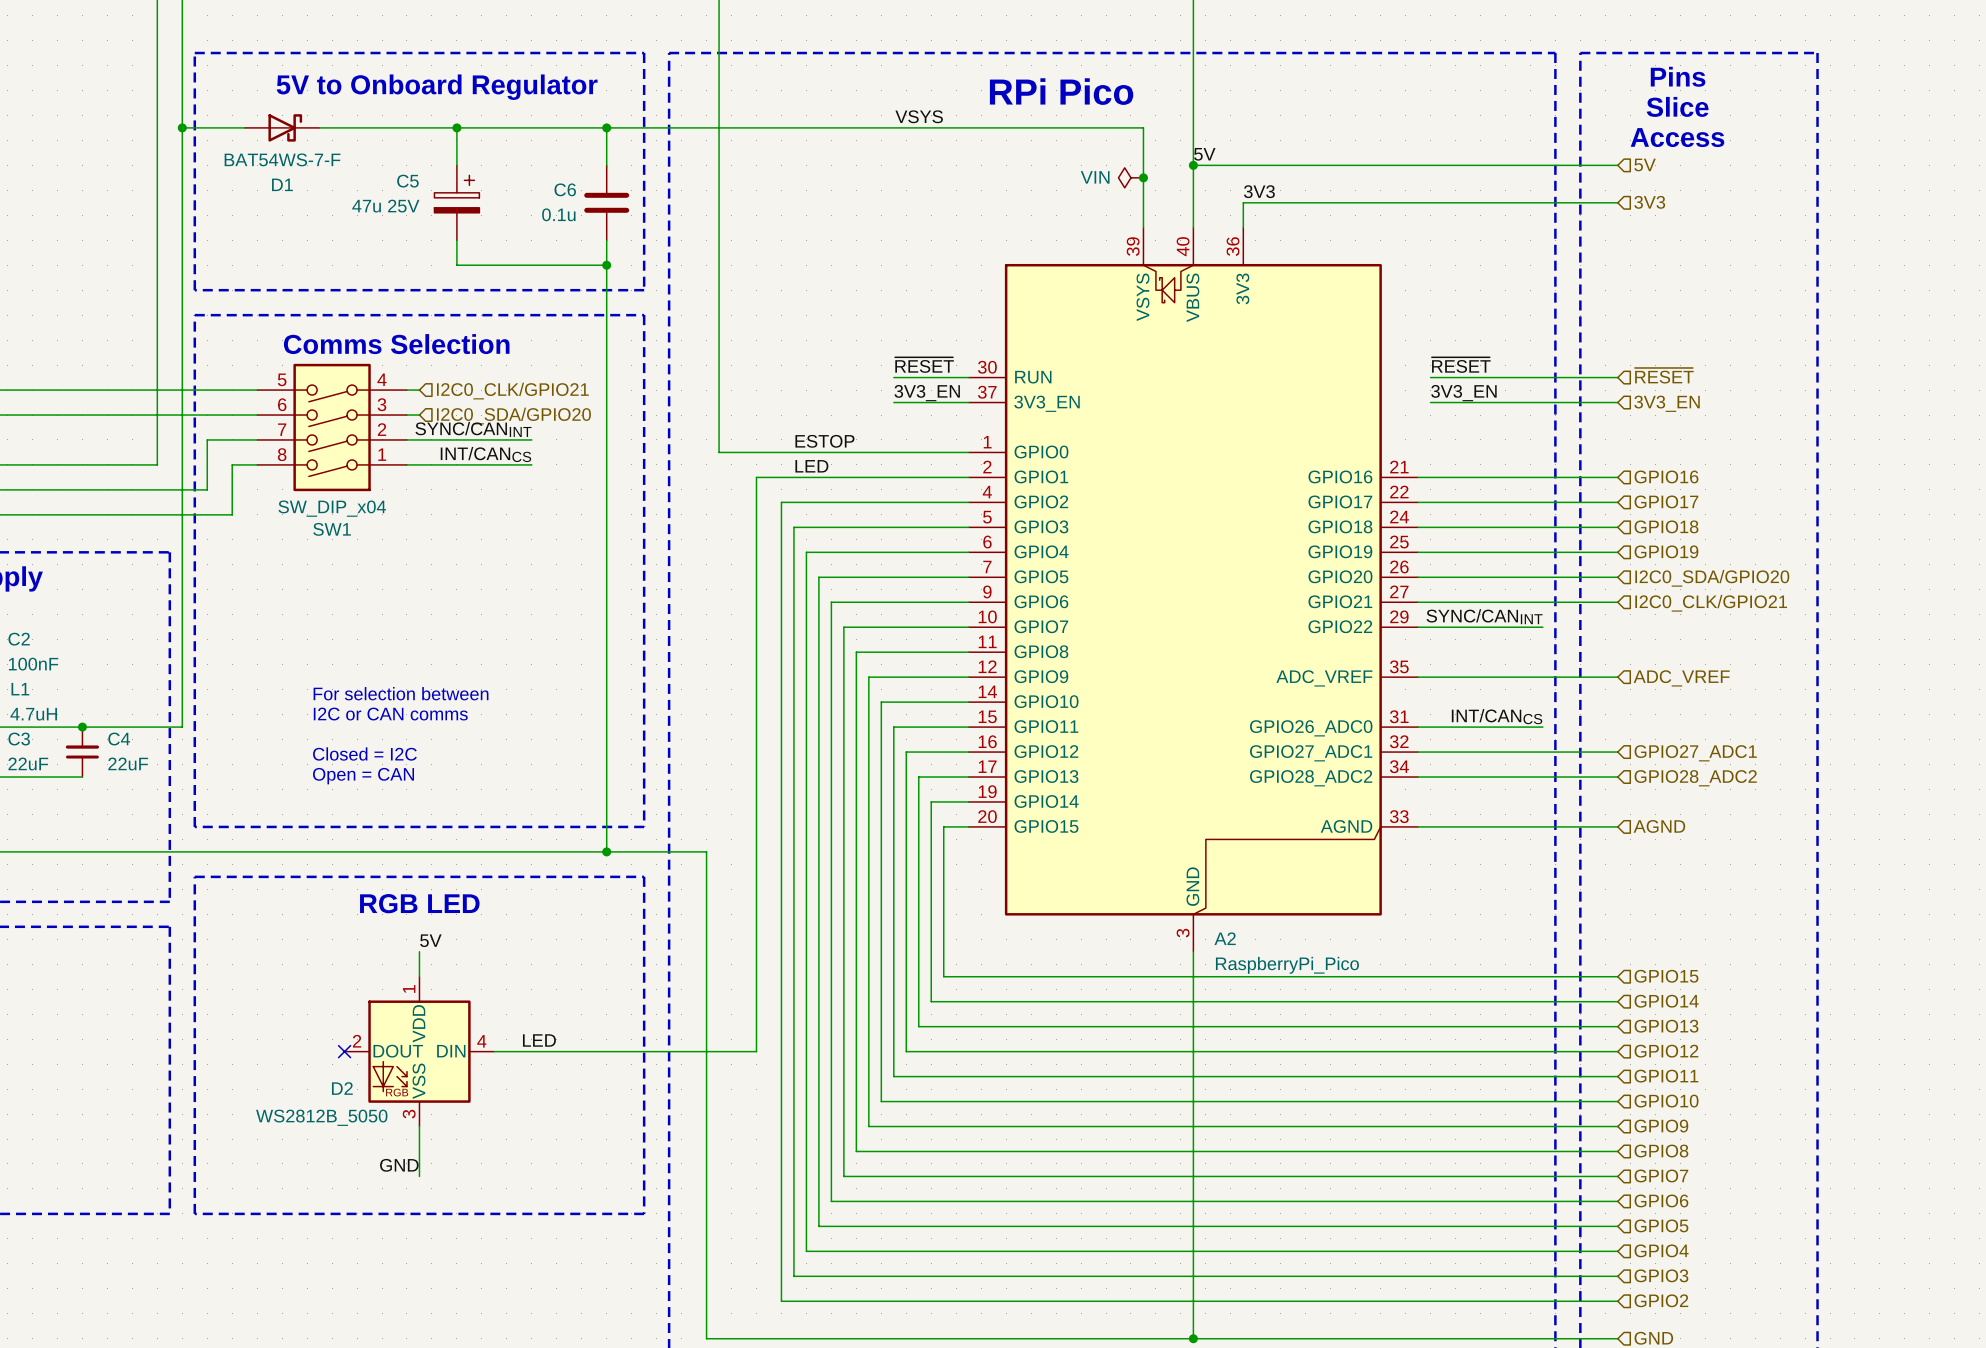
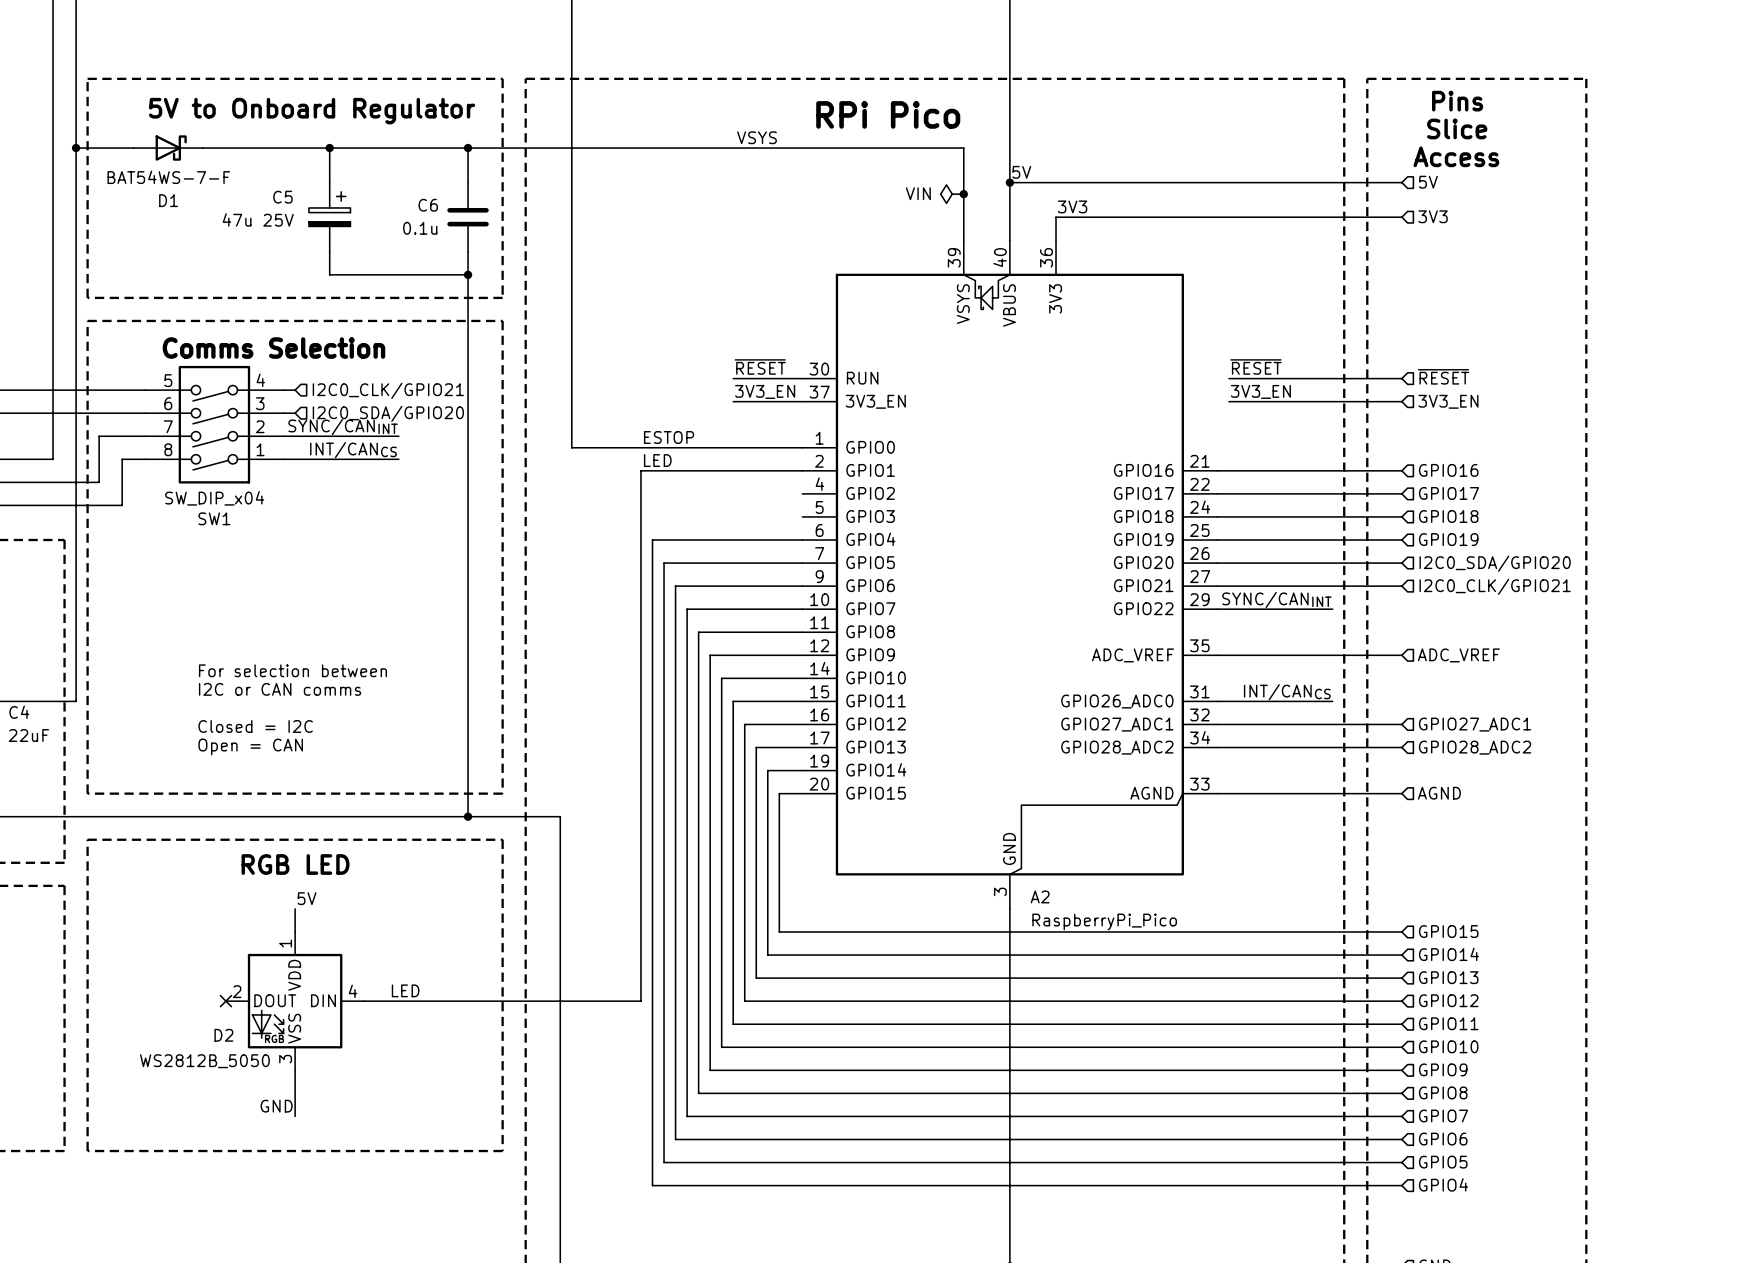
wire: (793, 477) (756, 477) (756, 1051) -> (640, 1001) (606, 1001)
wire: (968, 502) (781, 502) (781, 1301) (1617, 1301) -> none
wire: (793, 527) (968, 527) -> (640, 516) (640, 470)
wire: (793, 1051) (793, 1276) (1617, 1276) -> none
hierarchical label: GPIO3 (1661, 1275) -> none
hierarchical label: GPIO2 (1661, 1300) -> none

